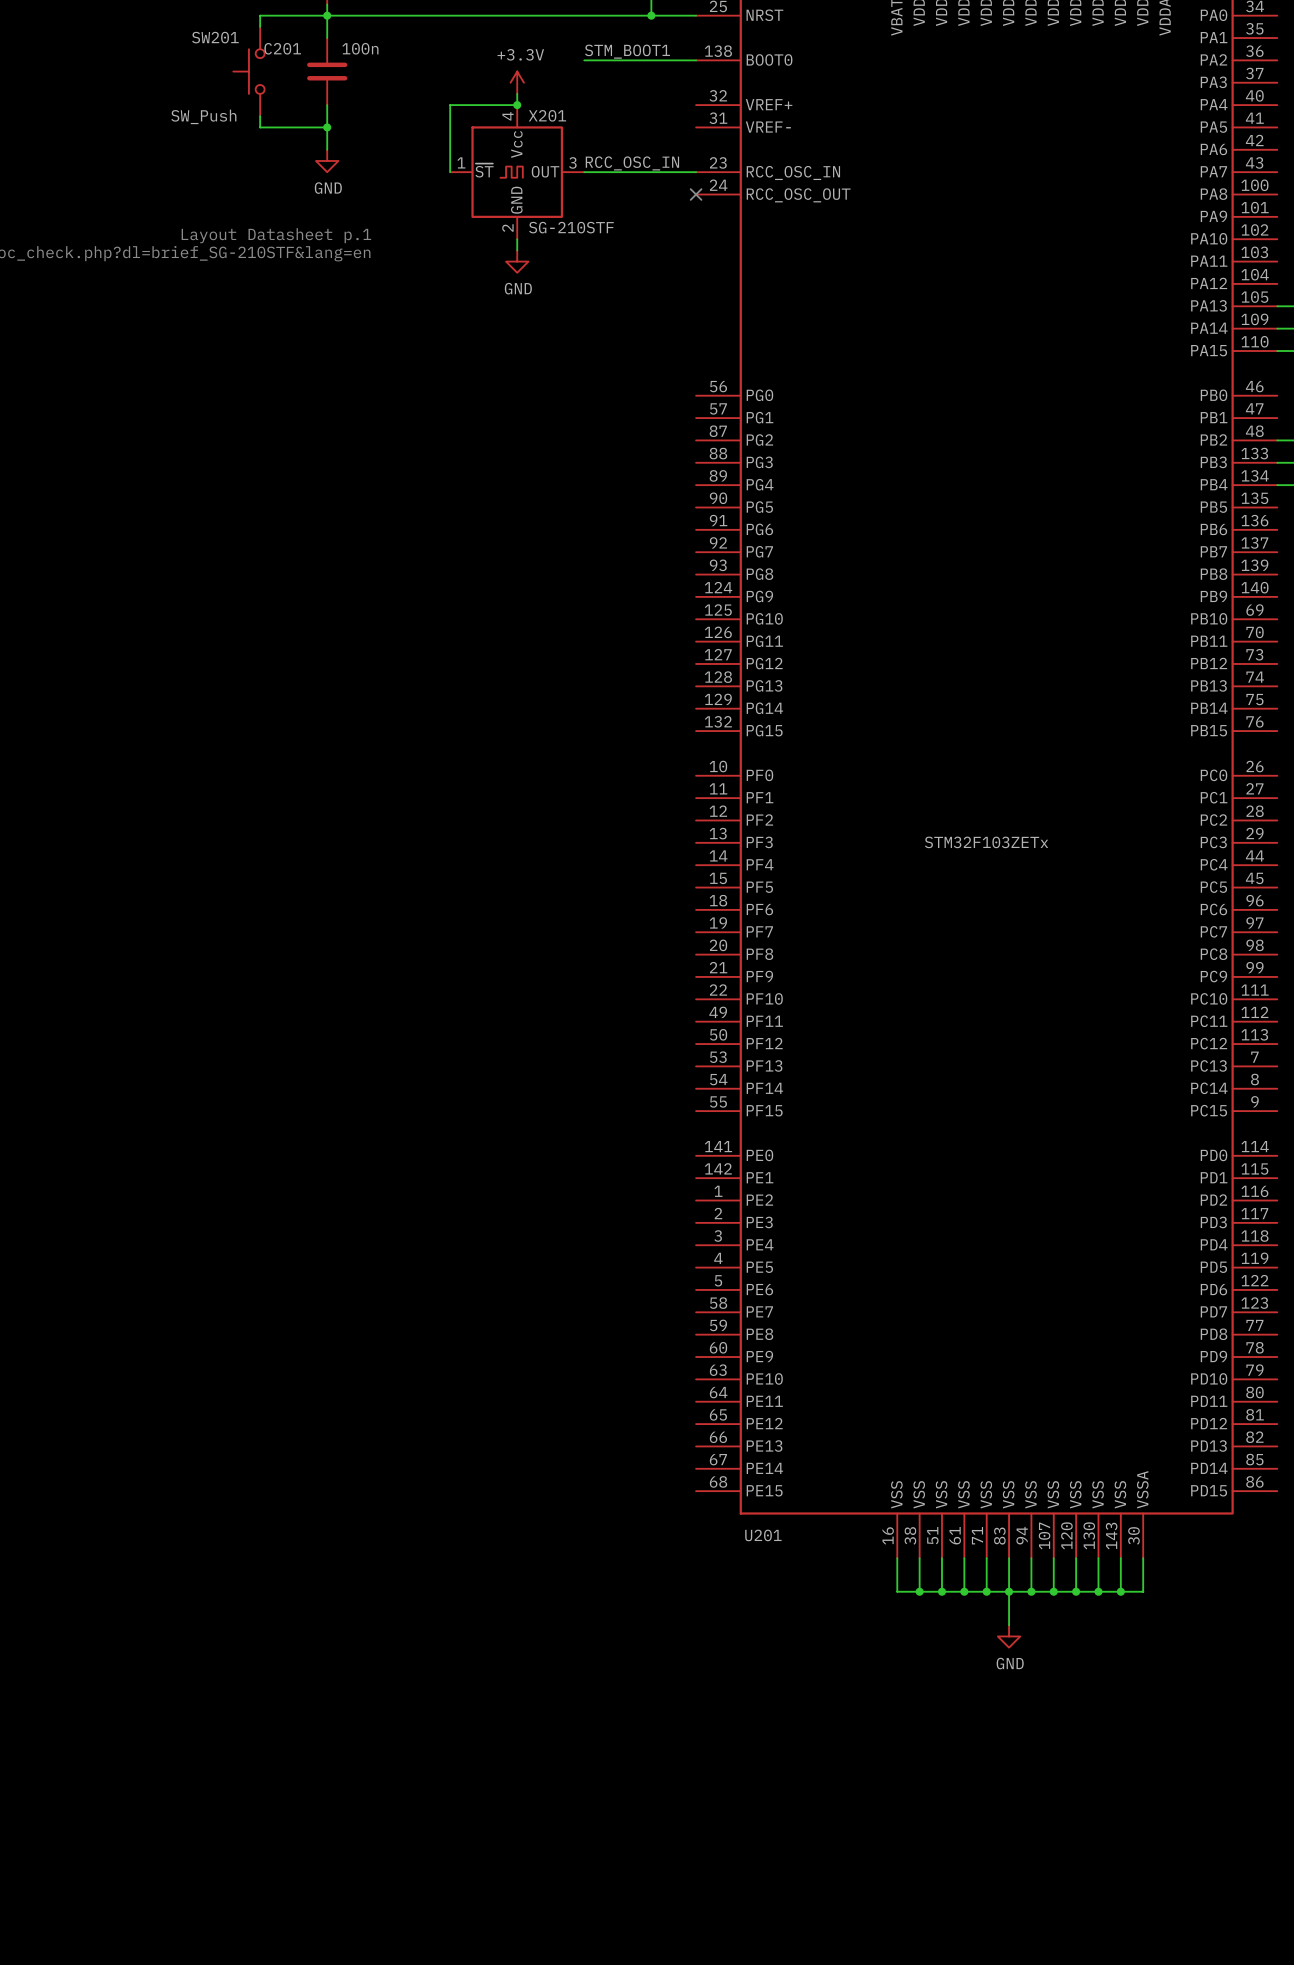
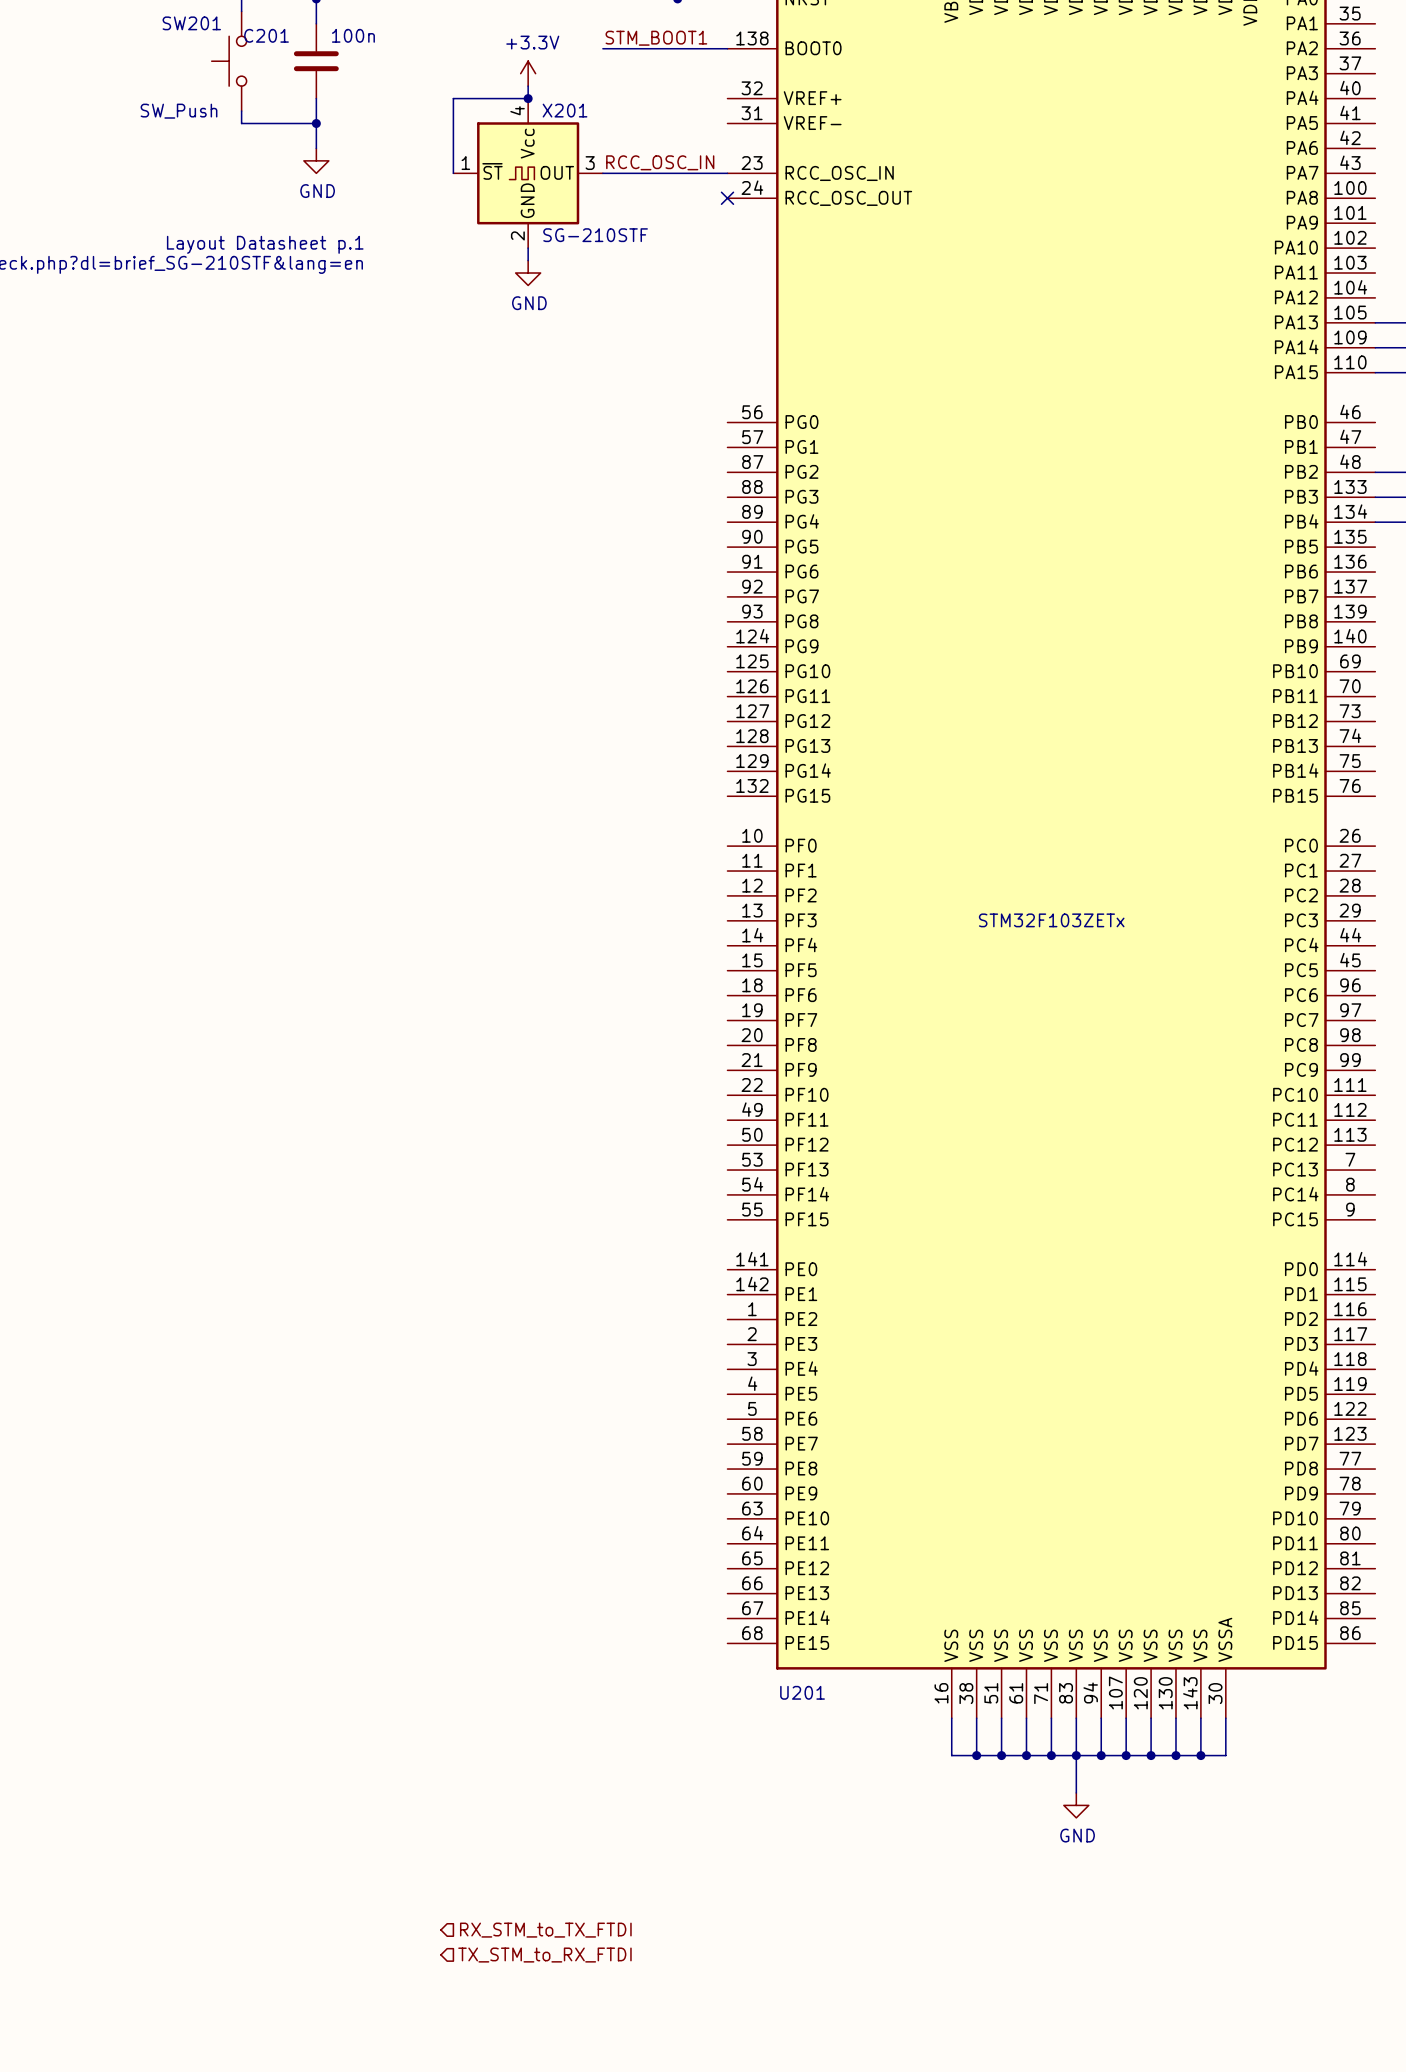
hierarchical label: none -> RX_STM_to_TX_FTDI (545, 1930)
hierarchical label: none -> TX_STM_to_RX_FTDI (544, 1955)

